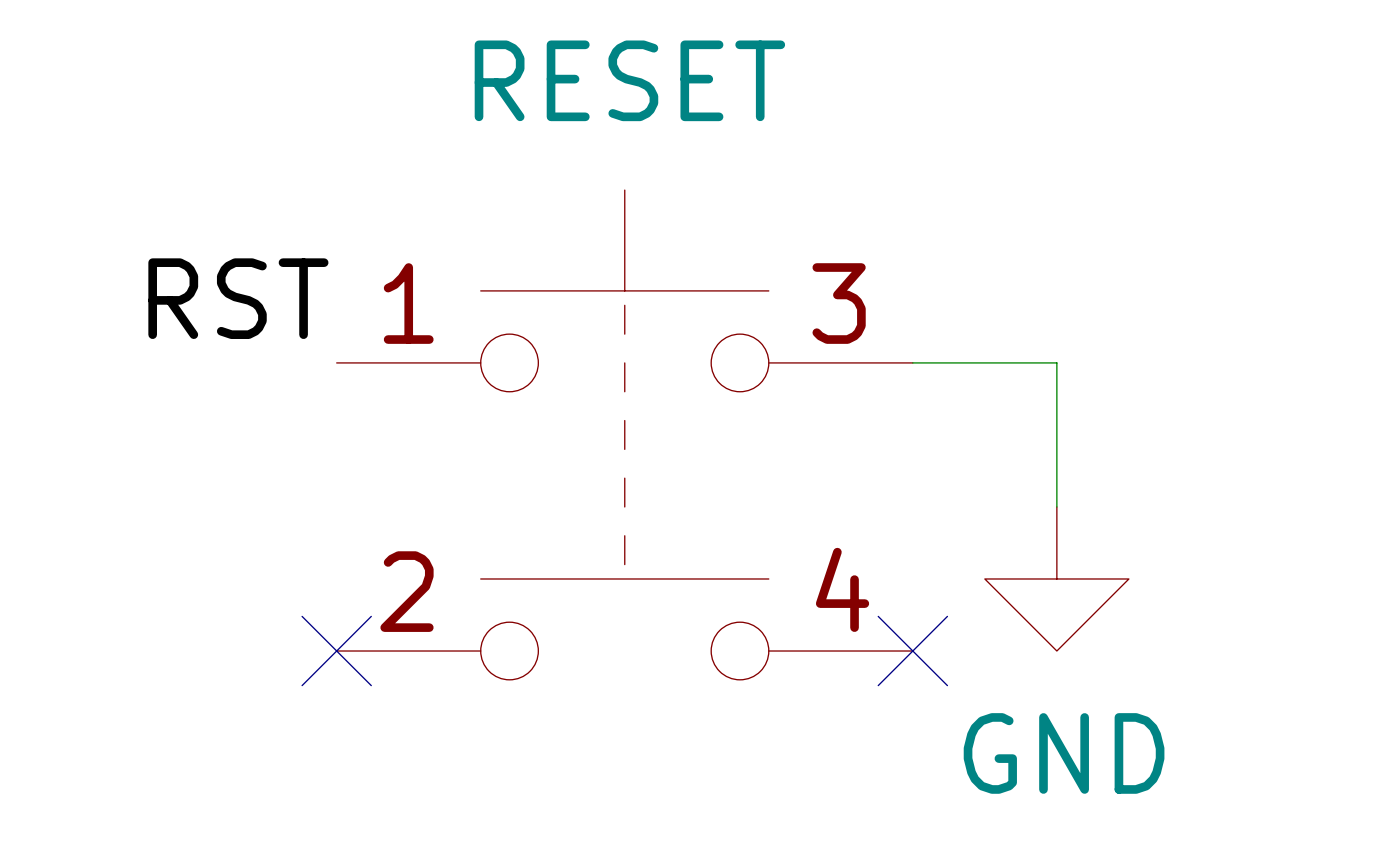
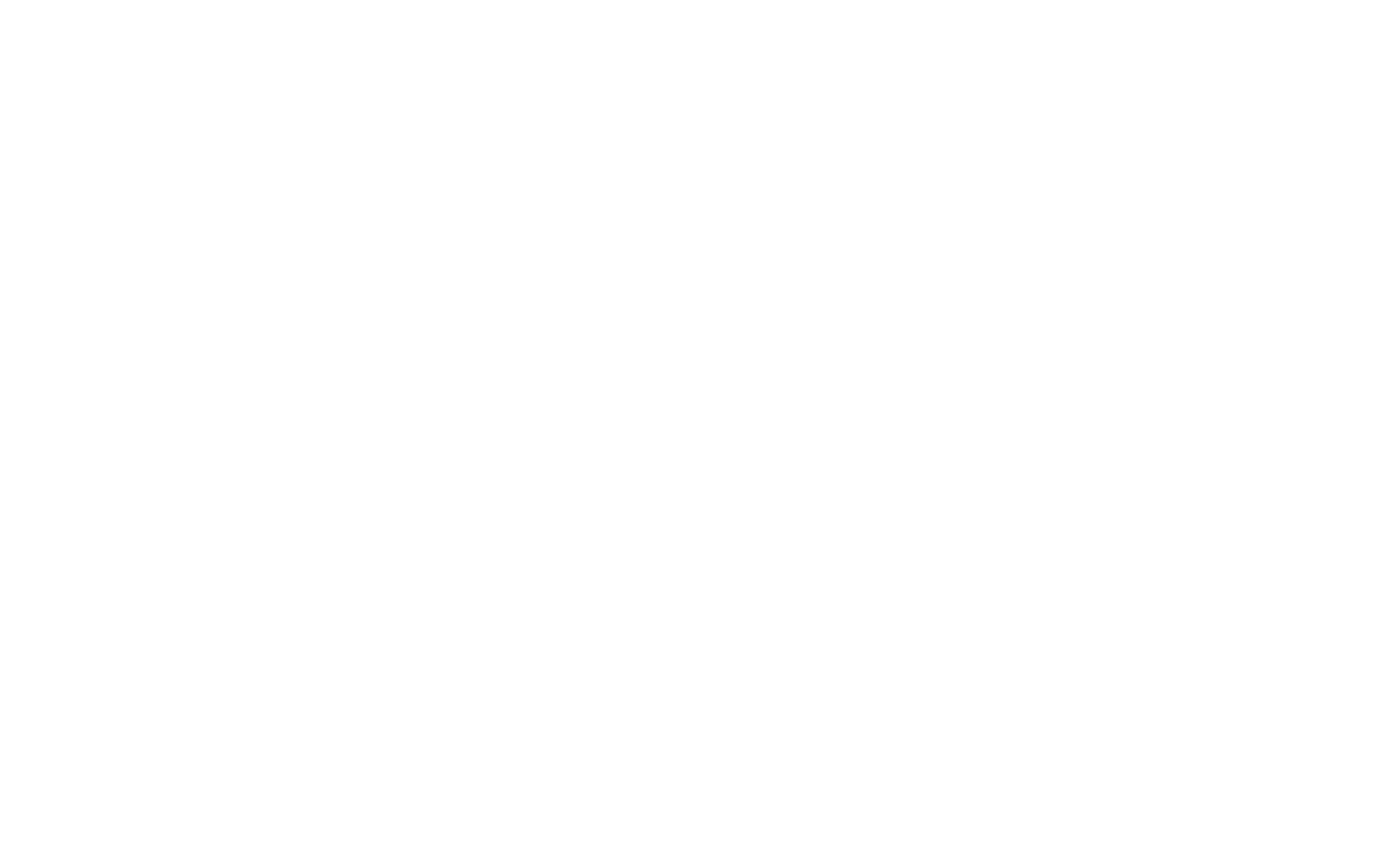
label: RST (238, 298) -> none
wire: (912, 362) (1056, 362) (1056, 506) -> none
part: RESET (624, 434) -> none
power symbol: GND (1056, 578) -> none
no-connect mark: (336, 651) -> none
no-connect mark: (912, 651) -> none

